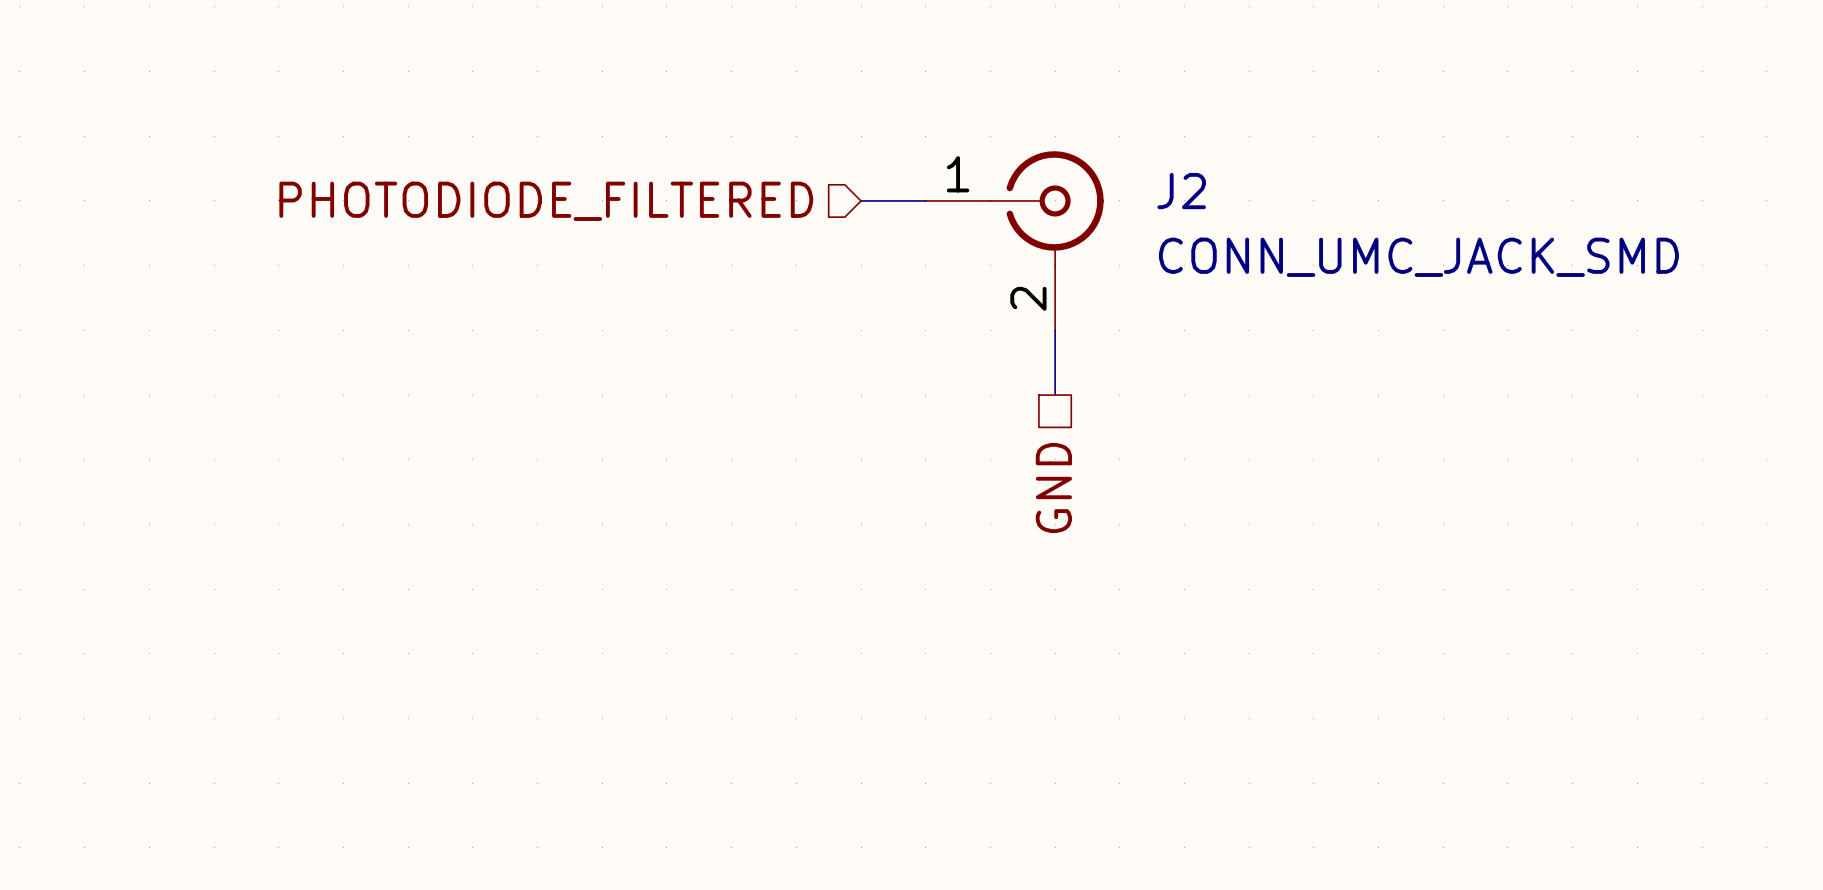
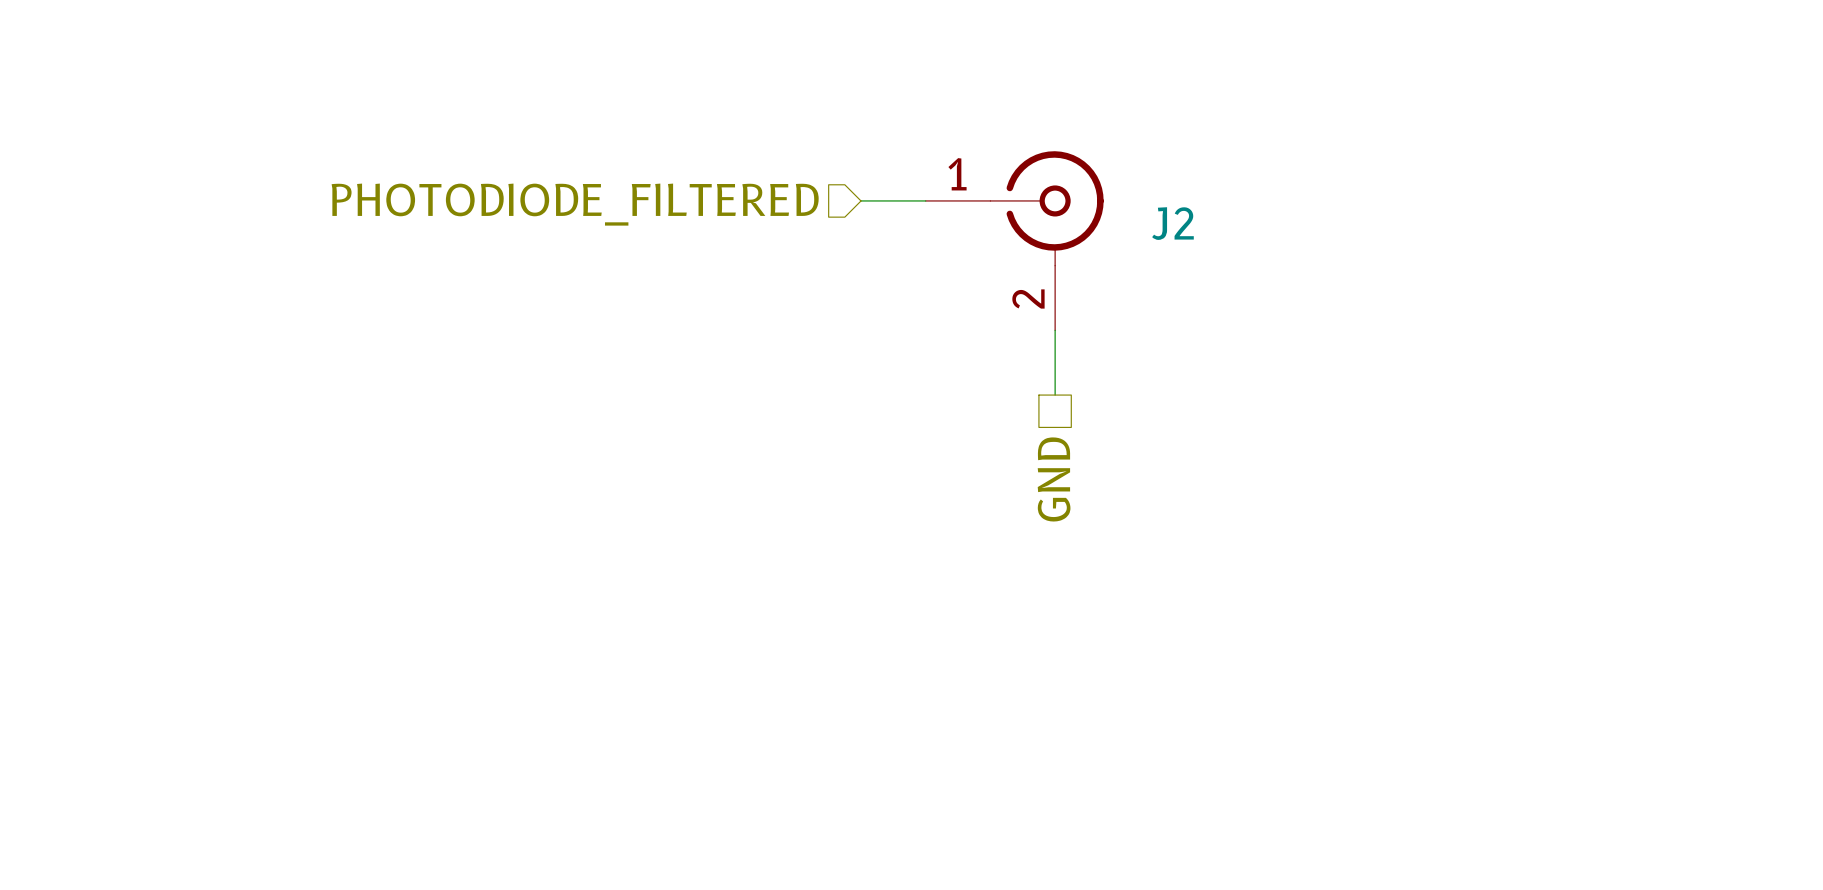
J2 name position: J2 (1181, 191) -> J2 (1172, 223)
J2 value: CONN_UMC_JACK_SMD (1418, 257) -> none

